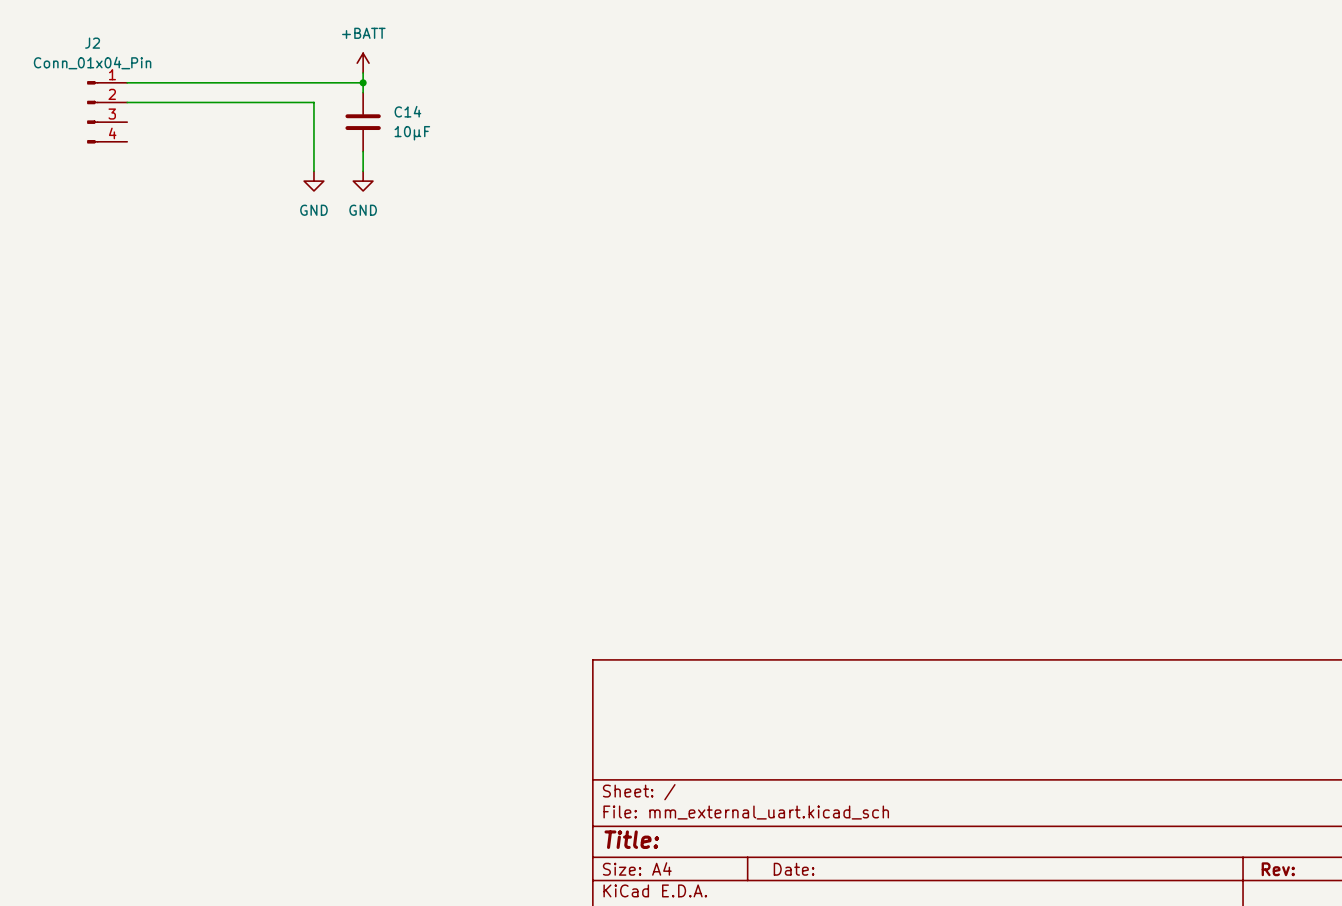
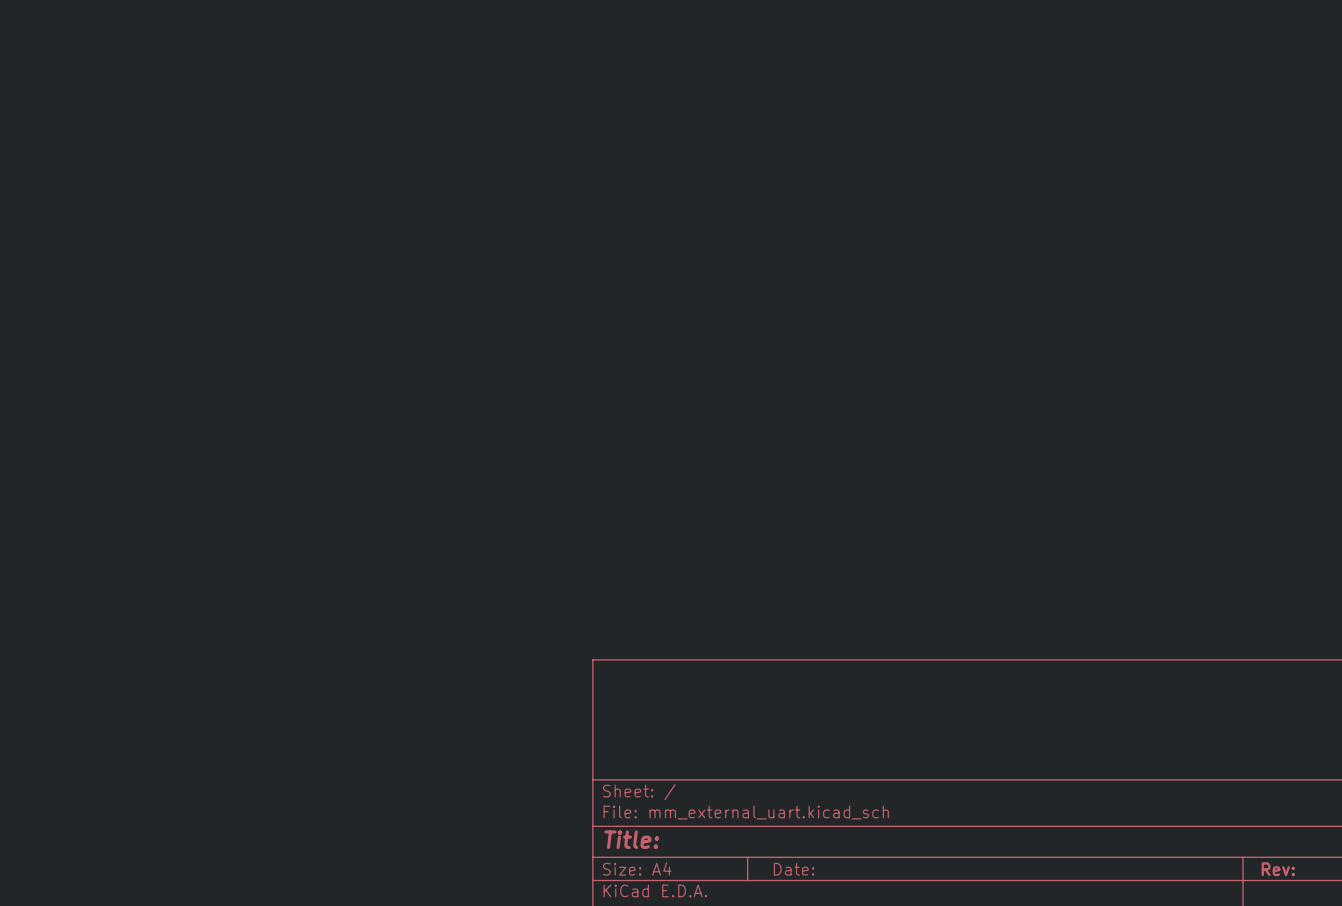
power symbol: +BATT (363, 63) -> none
wire: (363, 72) (363, 92) -> none
wire: (127, 82) (363, 82) -> none
junction: (363, 82) -> none
wire: (127, 102) (313, 102) (313, 171) -> none
J2: Conn_01x04_Pin (107, 112) -> none
C14: 10µF (363, 122) -> none
wire: (363, 151) (363, 171) -> none
power symbol: GND (313, 181) -> none
power symbol: GND (363, 181) -> none

